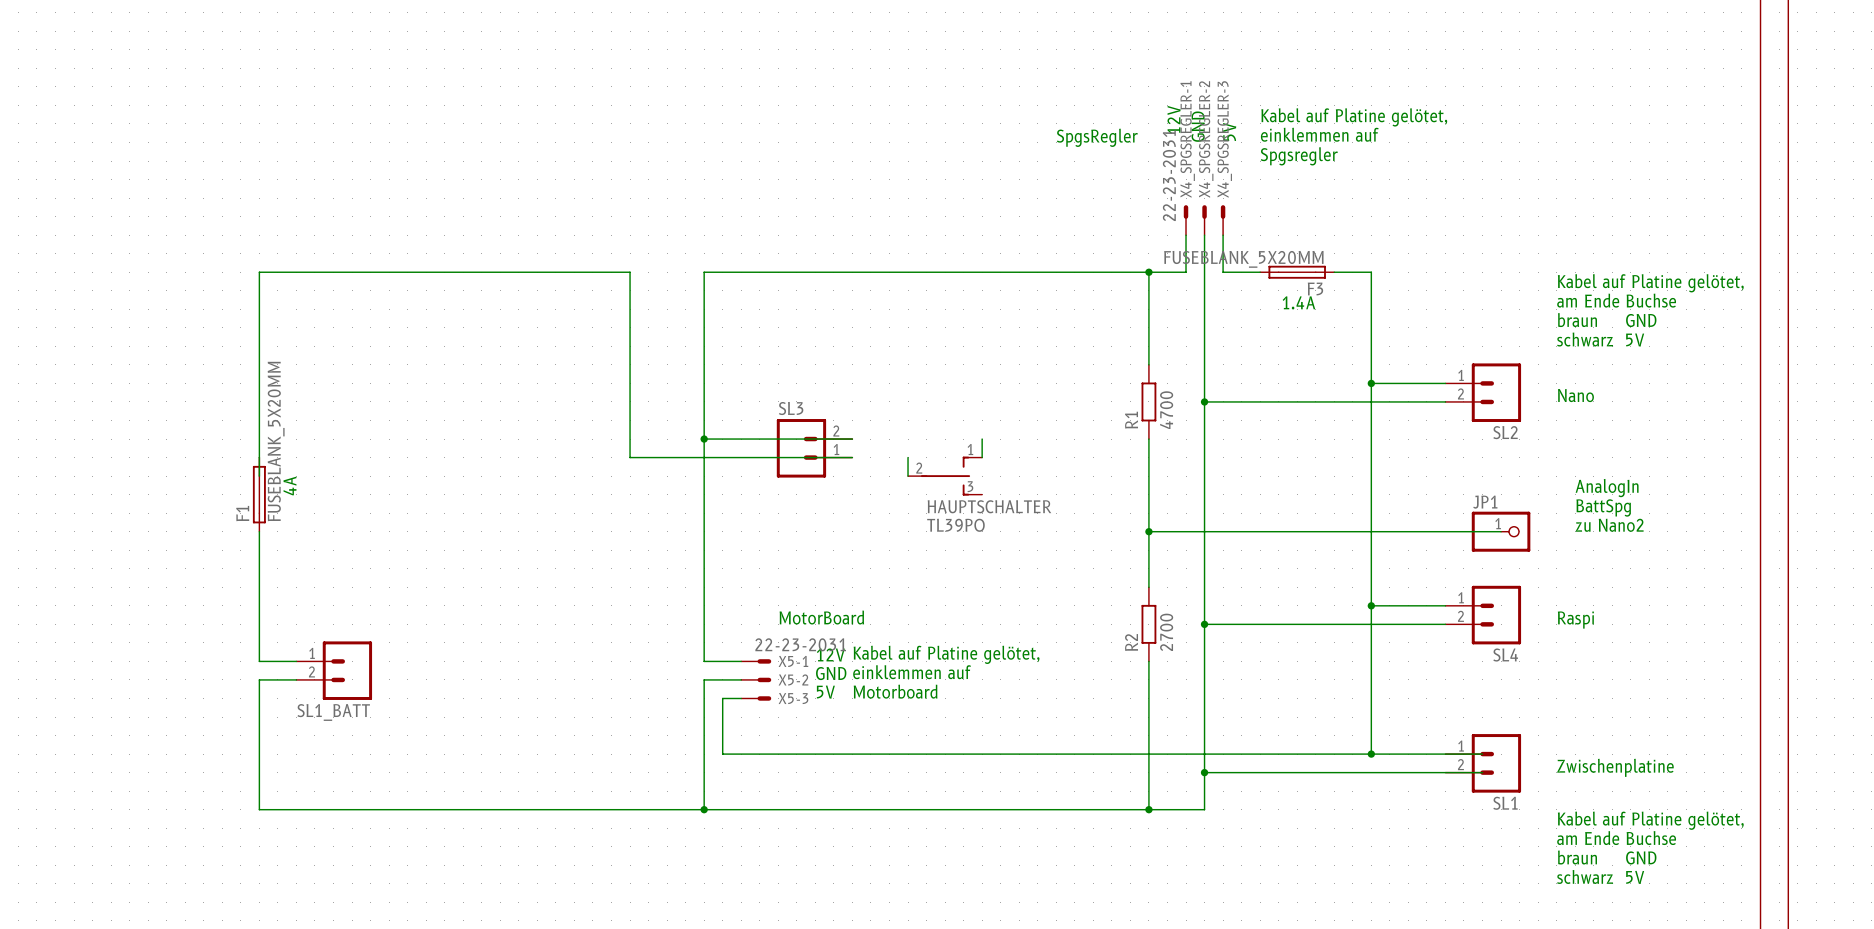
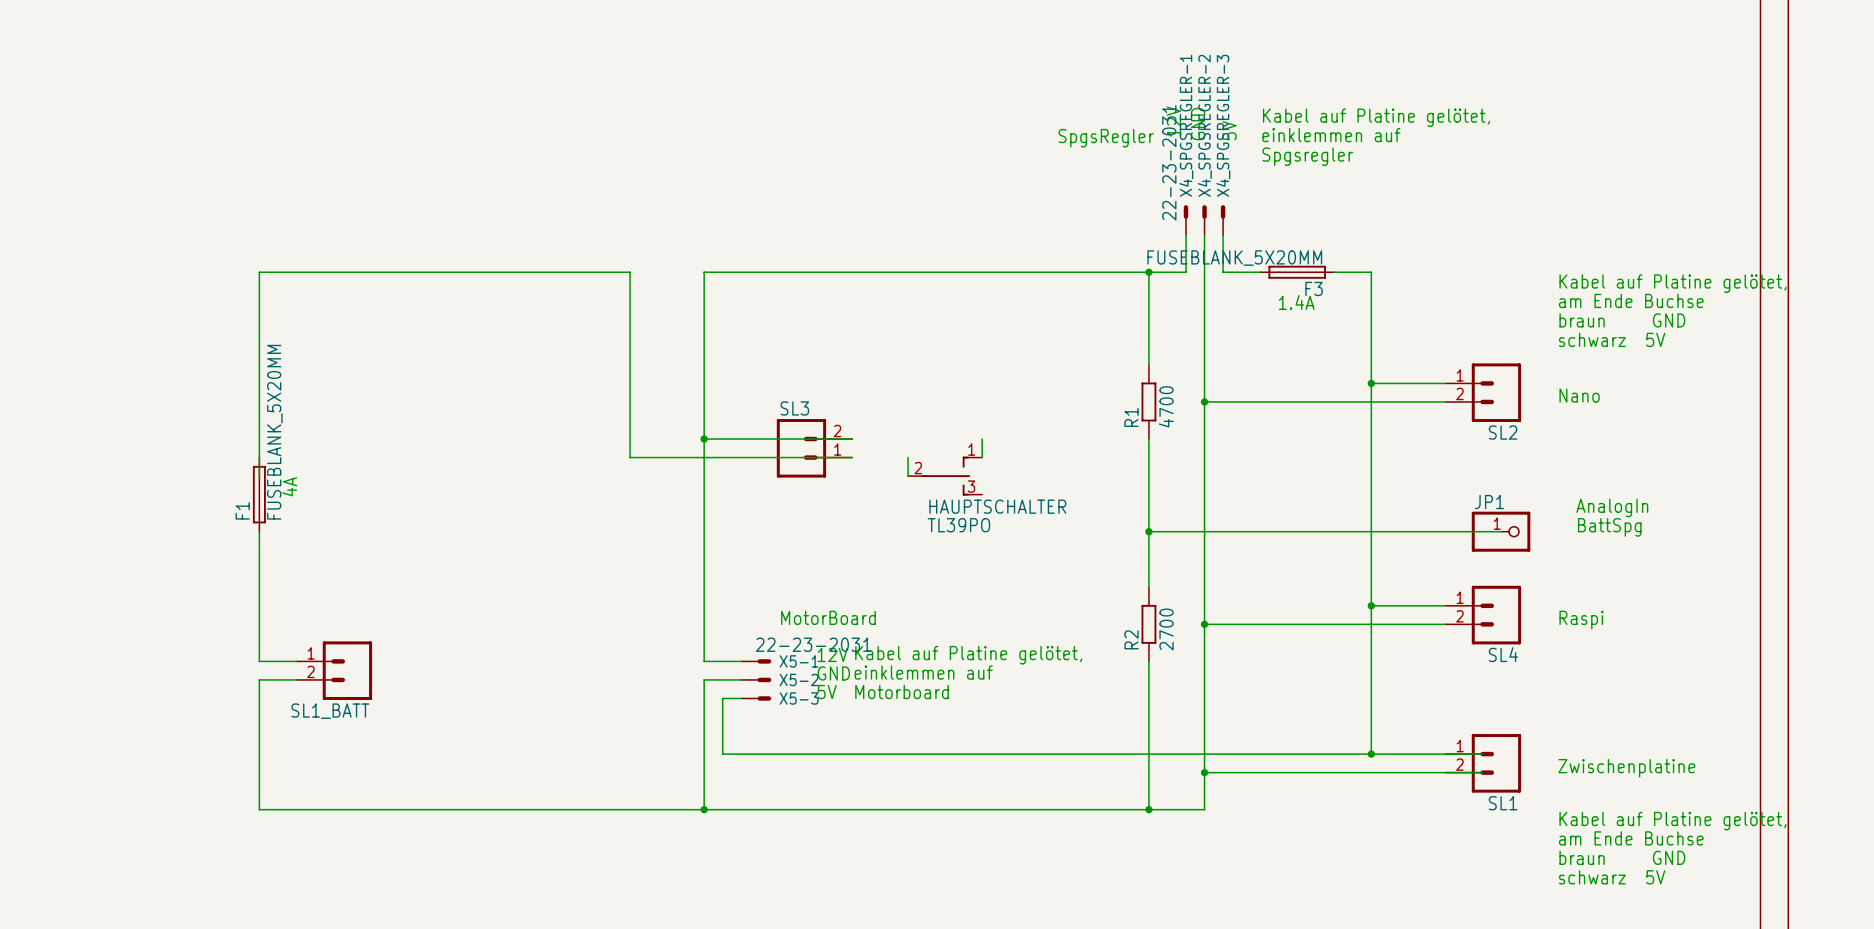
text: AnalogIn (1607, 488) -> none
text: BattSpg (1603, 507) -> AnalogIn (1612, 507)
text: zu Nano2 (1609, 525) -> BattSpg (1609, 527)

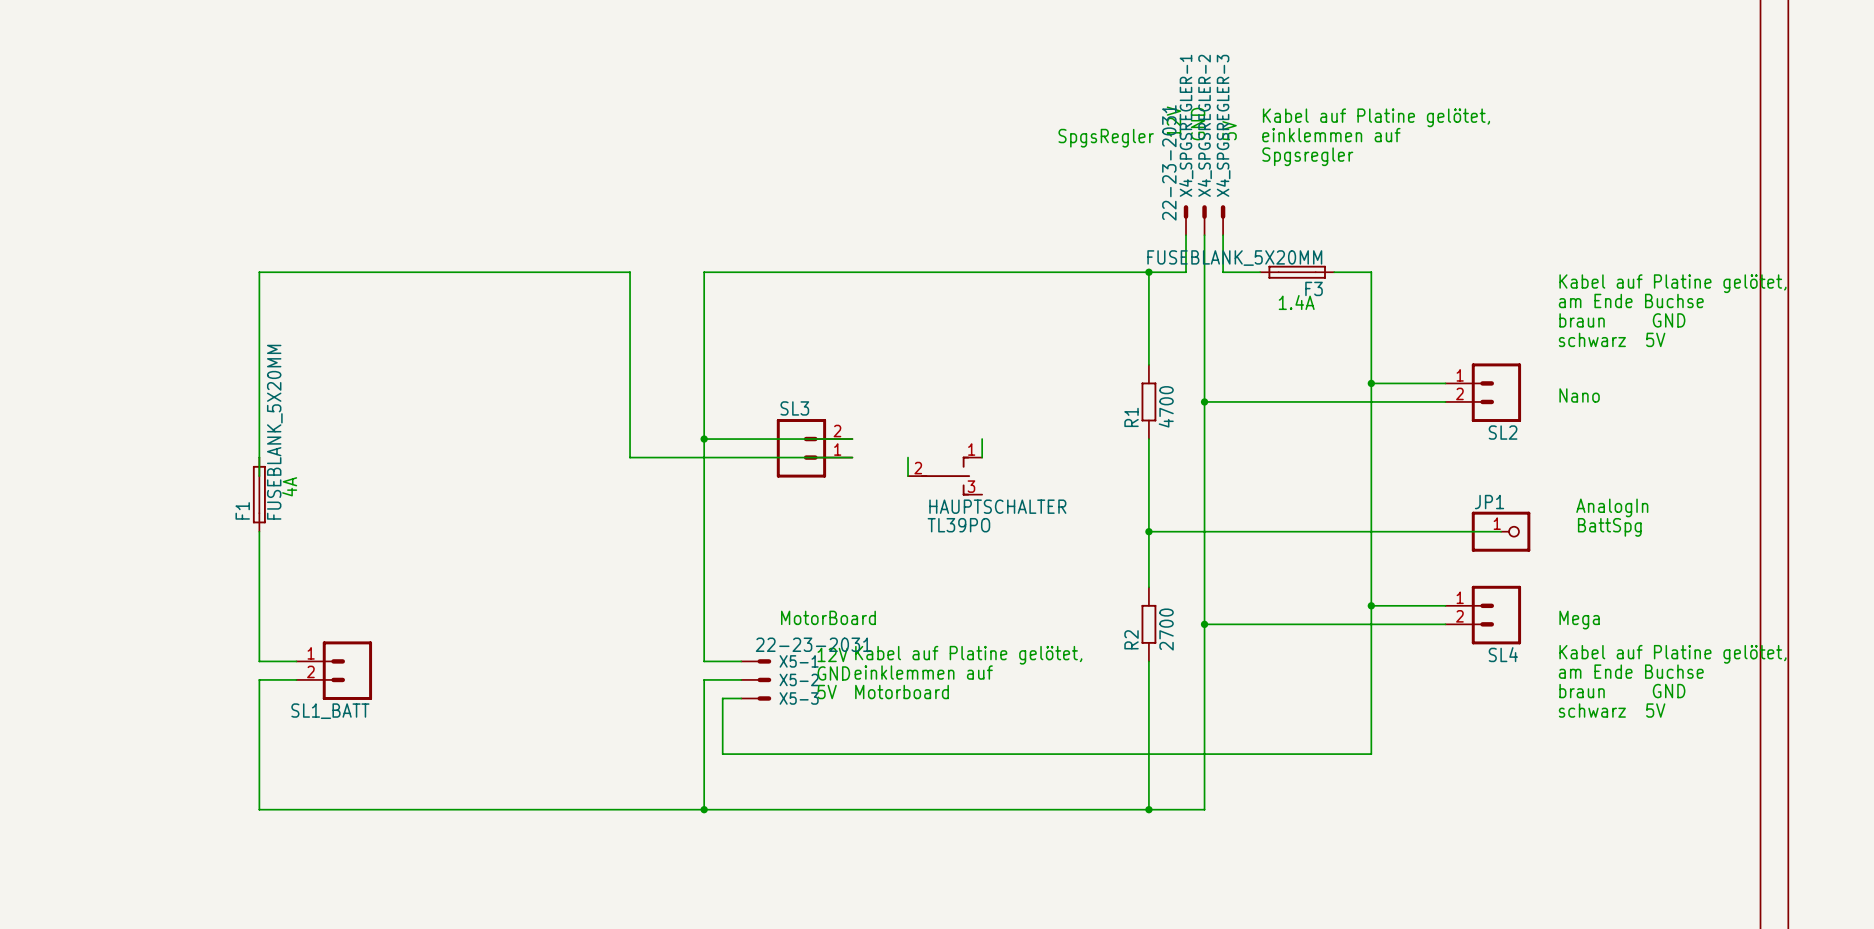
text: Raspi (1581, 620) -> Mega (1579, 620)
wire: (1371, 754) (1482, 754) -> none
junction: (1371, 754) -> none
SL1: (1483, 763) -> none
text: Zwischenplatine (1626, 768) -> none
wire: (1204, 772) (1482, 772) -> none
junction: (1204, 772) -> none
text position: Kabel auf Platine gelötet, (1672, 821) -> Kabel auf Platine gelötet, (1672, 654)
text position: am Ende Buchse (1631, 838) -> am Ende Buchse (1631, 671)
text position: braun GND (1622, 857) -> braun GND (1622, 691)
text position: schwarz 5V (1612, 877) -> schwarz 5V (1612, 710)

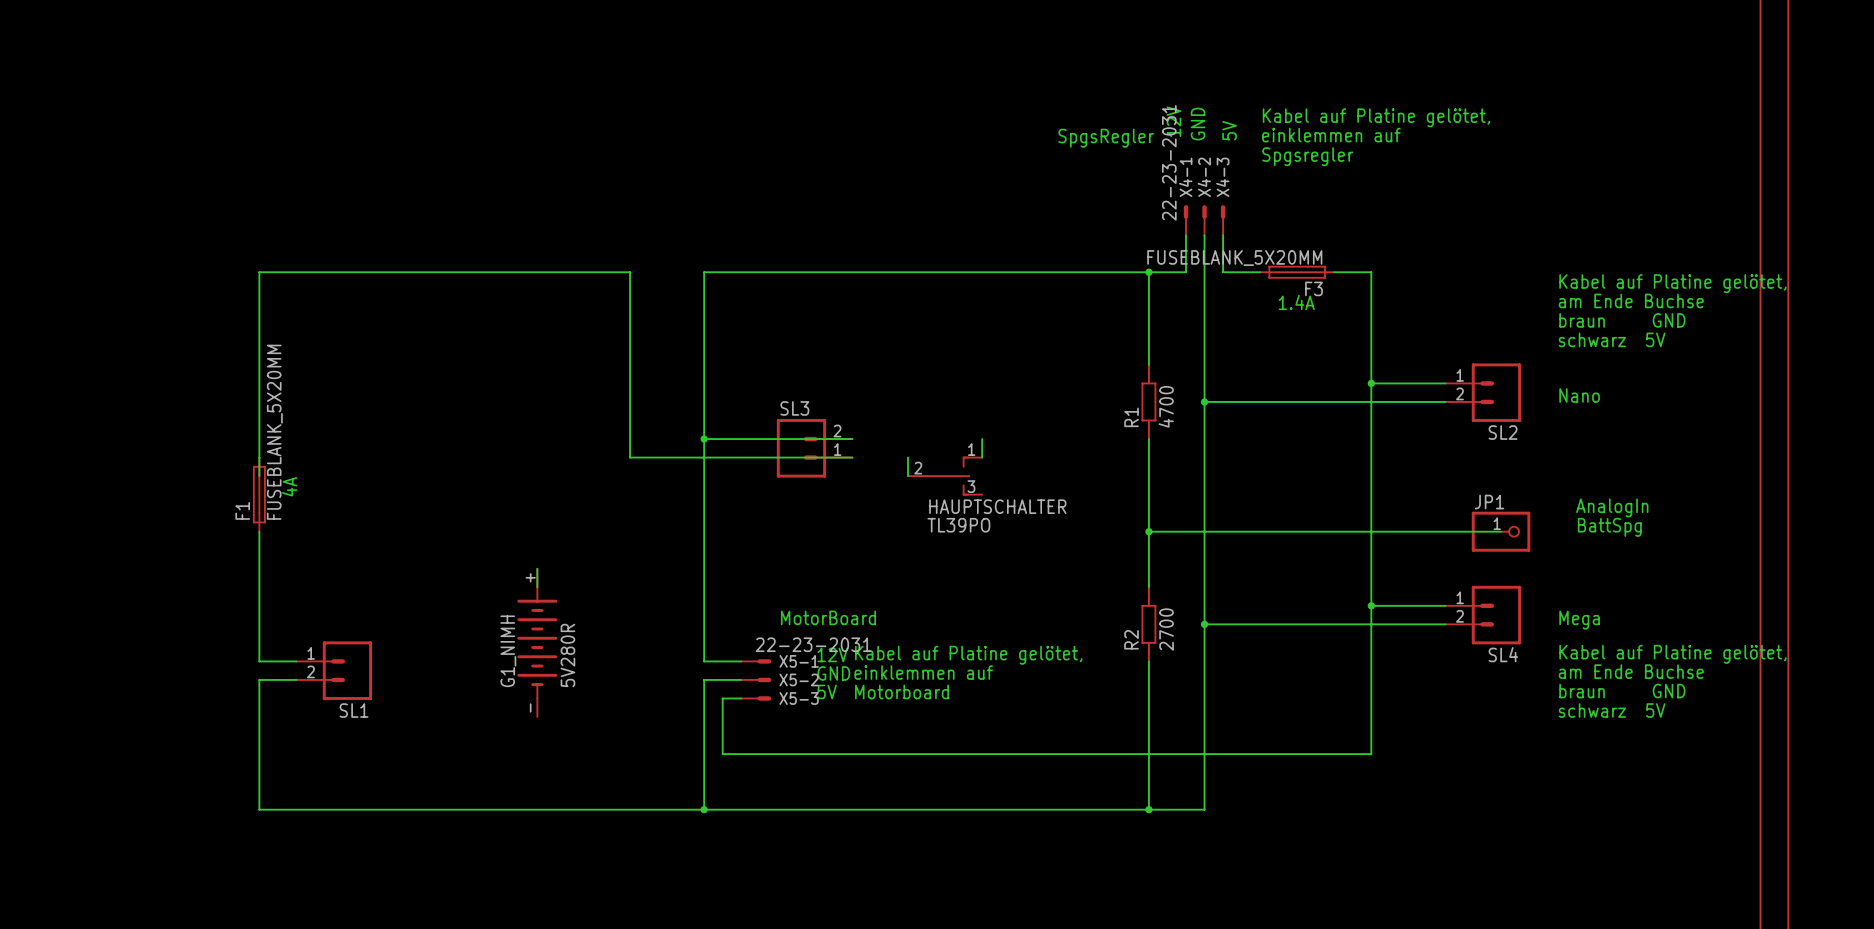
X4_SPGSREGLER-1 name: X4_SPGSREGLER-1 (1186, 125) -> X4-1 (1185, 177)
X4_SPGSREGLER-2 name: X4_SPGSREGLER-2 (1204, 125) -> X4-2 (1204, 177)
X4_SPGSREGLER-3 name: X4_SPGSREGLER-3 (1223, 125) -> X4-3 (1222, 177)
wire: none -> (537, 568) (537, 587)
G1_NIMH: none -> 5V280R (537, 642)
SL1_BATT name: SL1_BATT (330, 711) -> SL1 (354, 710)

